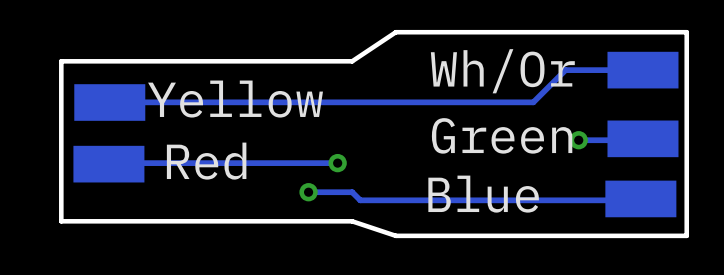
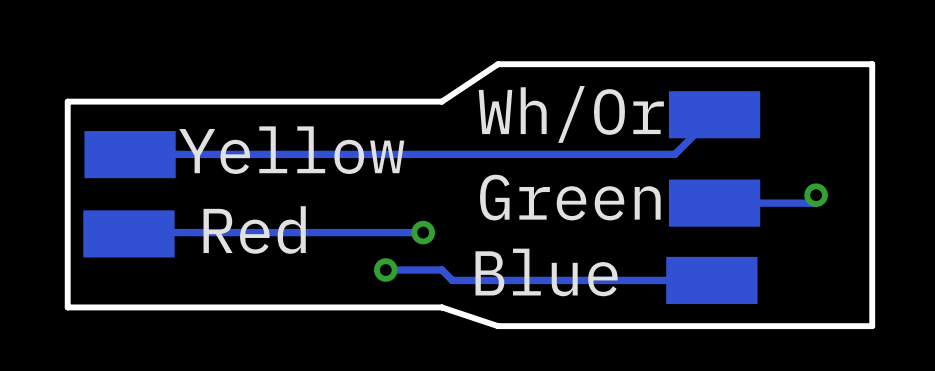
track: (642, 70) (564, 71) -> none
text position: Wh/Or (502, 71) -> Wh/Or (571, 114)
part position: (641, 134) -> (713, 197)
text position: Green (502, 135) -> Green (570, 197)
via position: (578, 140) -> (816, 195)
text position: Blue (483, 194) -> Blue (546, 272)
track: (640, 198) (562, 200) -> none

